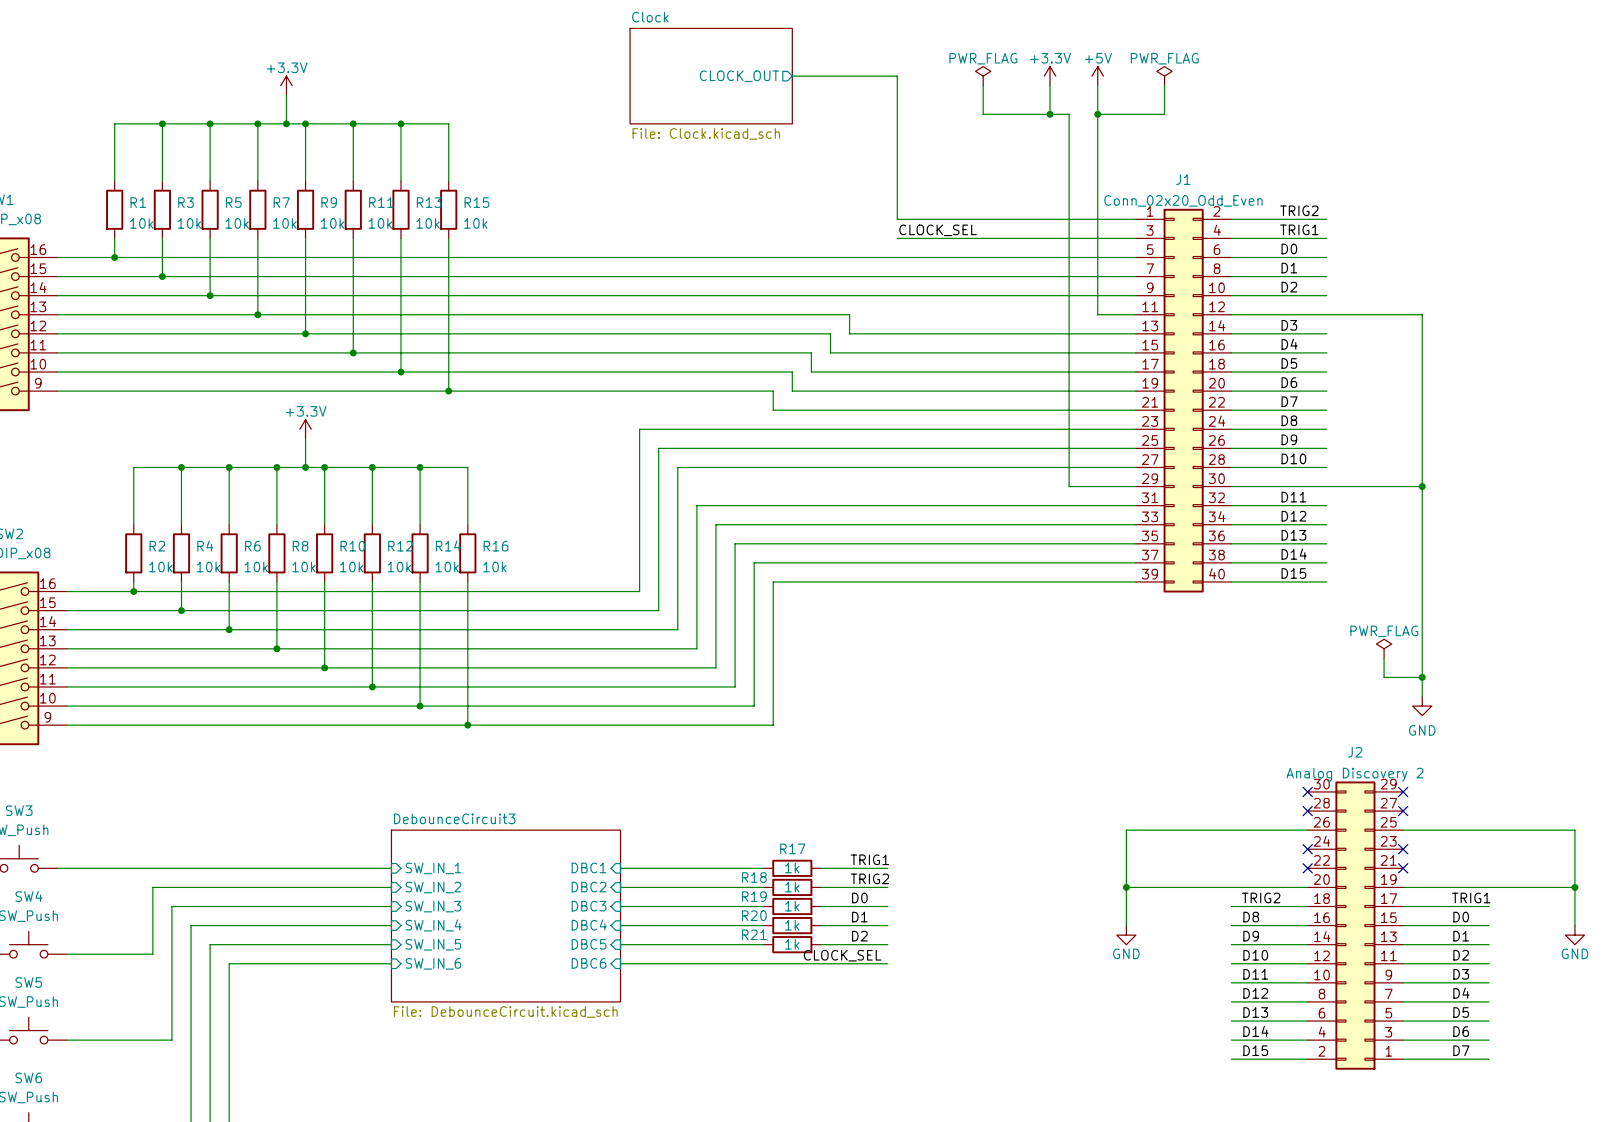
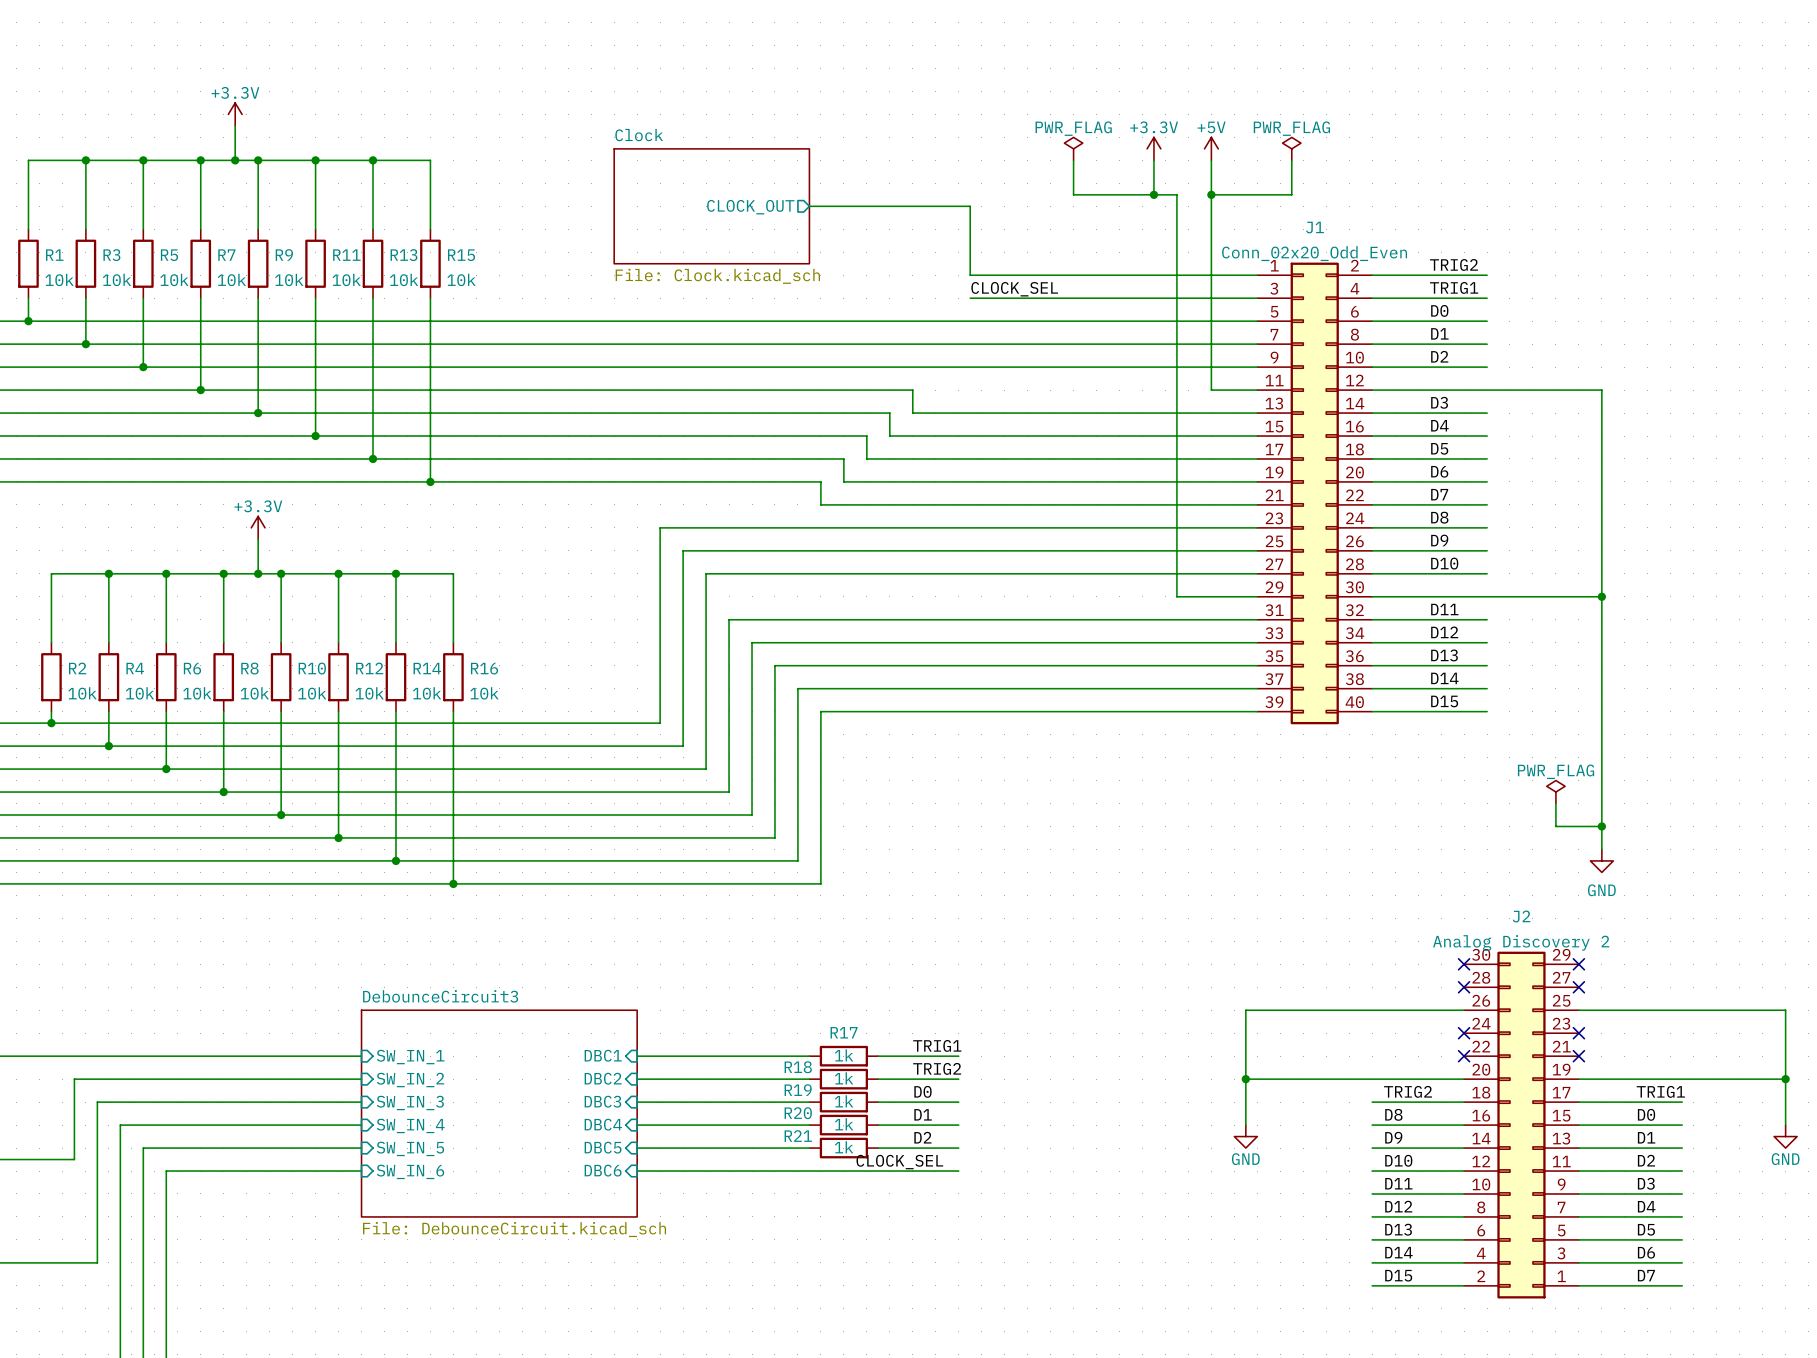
sheet Clock position: (711, 76) -> (711, 206)
sheet pin position: CLOCK_OUT (739, 76) -> CLOCK_OUT (750, 207)
wire: (792, 76) (897, 76) (897, 162) -> (809, 206) (970, 206)
power symbol position: PWR_FLAG (983, 76) -> PWR_FLAG (1073, 148)
power symbol position: +3.3V (1050, 76) -> +3.3V (1153, 148)
power symbol position: +5V (1097, 76) -> +5V (1211, 148)
power symbol position: PWR_FLAG (1164, 76) -> PWR_FLAG (1291, 148)
wire: (983, 85) (983, 114) (1069, 114) (1069, 152) -> (1073, 160) (1073, 194) (1176, 194)
wire: (1050, 85) (1050, 114) -> (1153, 160) (1153, 194)
wire: (1164, 85) (1164, 114) (1097, 114) -> (1291, 160) (1291, 194) (1211, 194)
junction: (1050, 114) -> none
junction: (1097, 114) -> none
junction: none -> (1153, 194)
junction: none -> (1211, 194)

